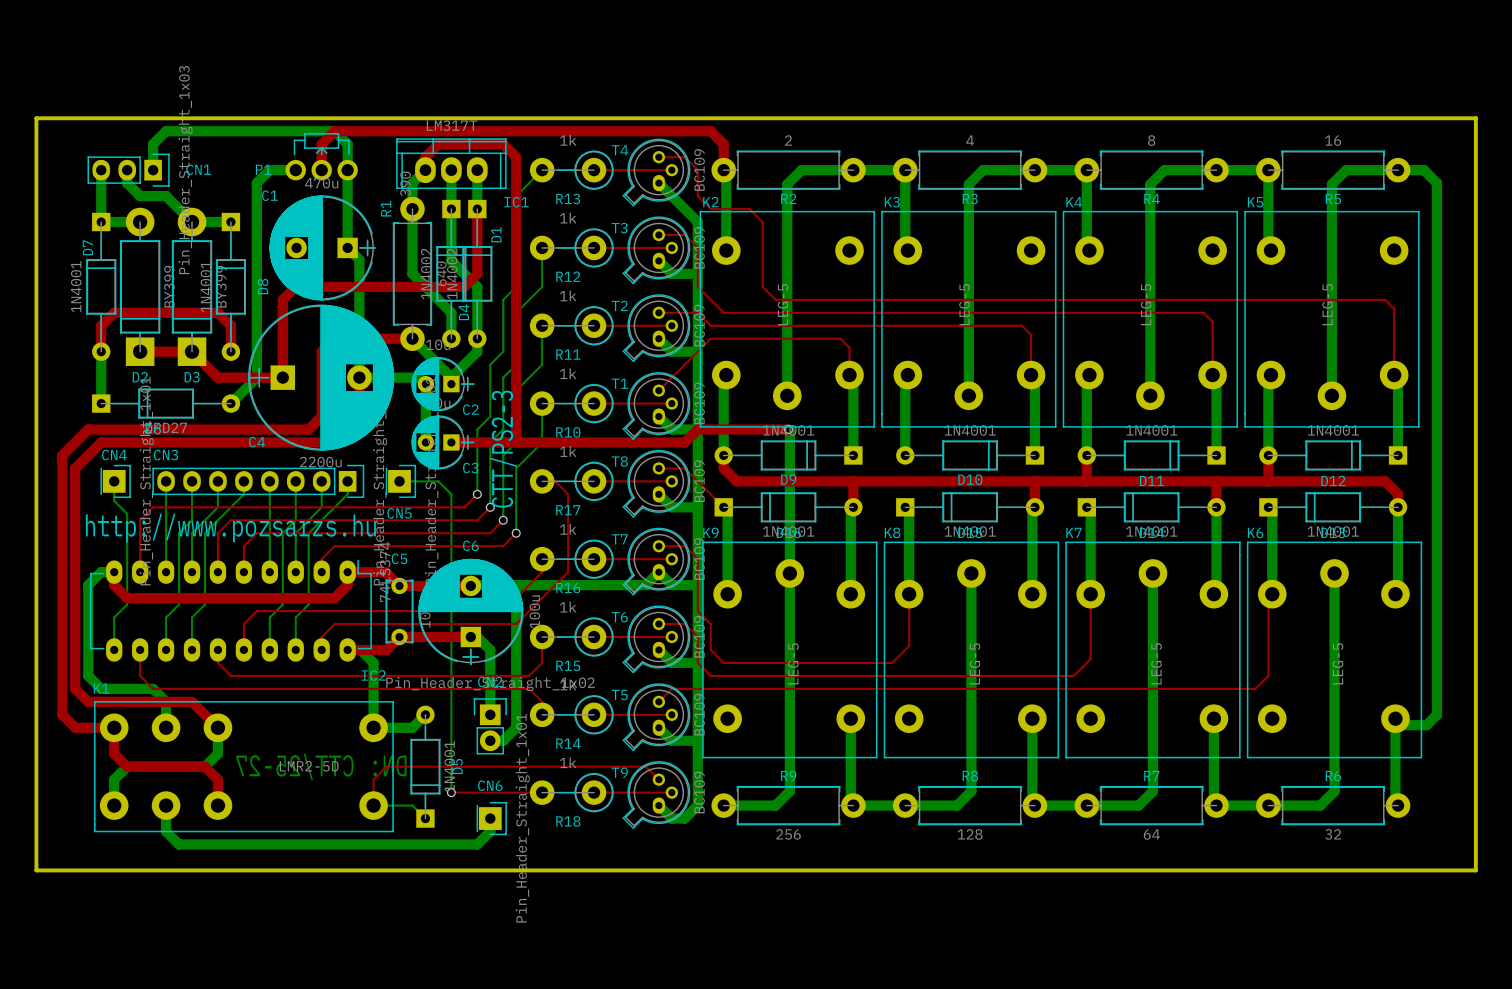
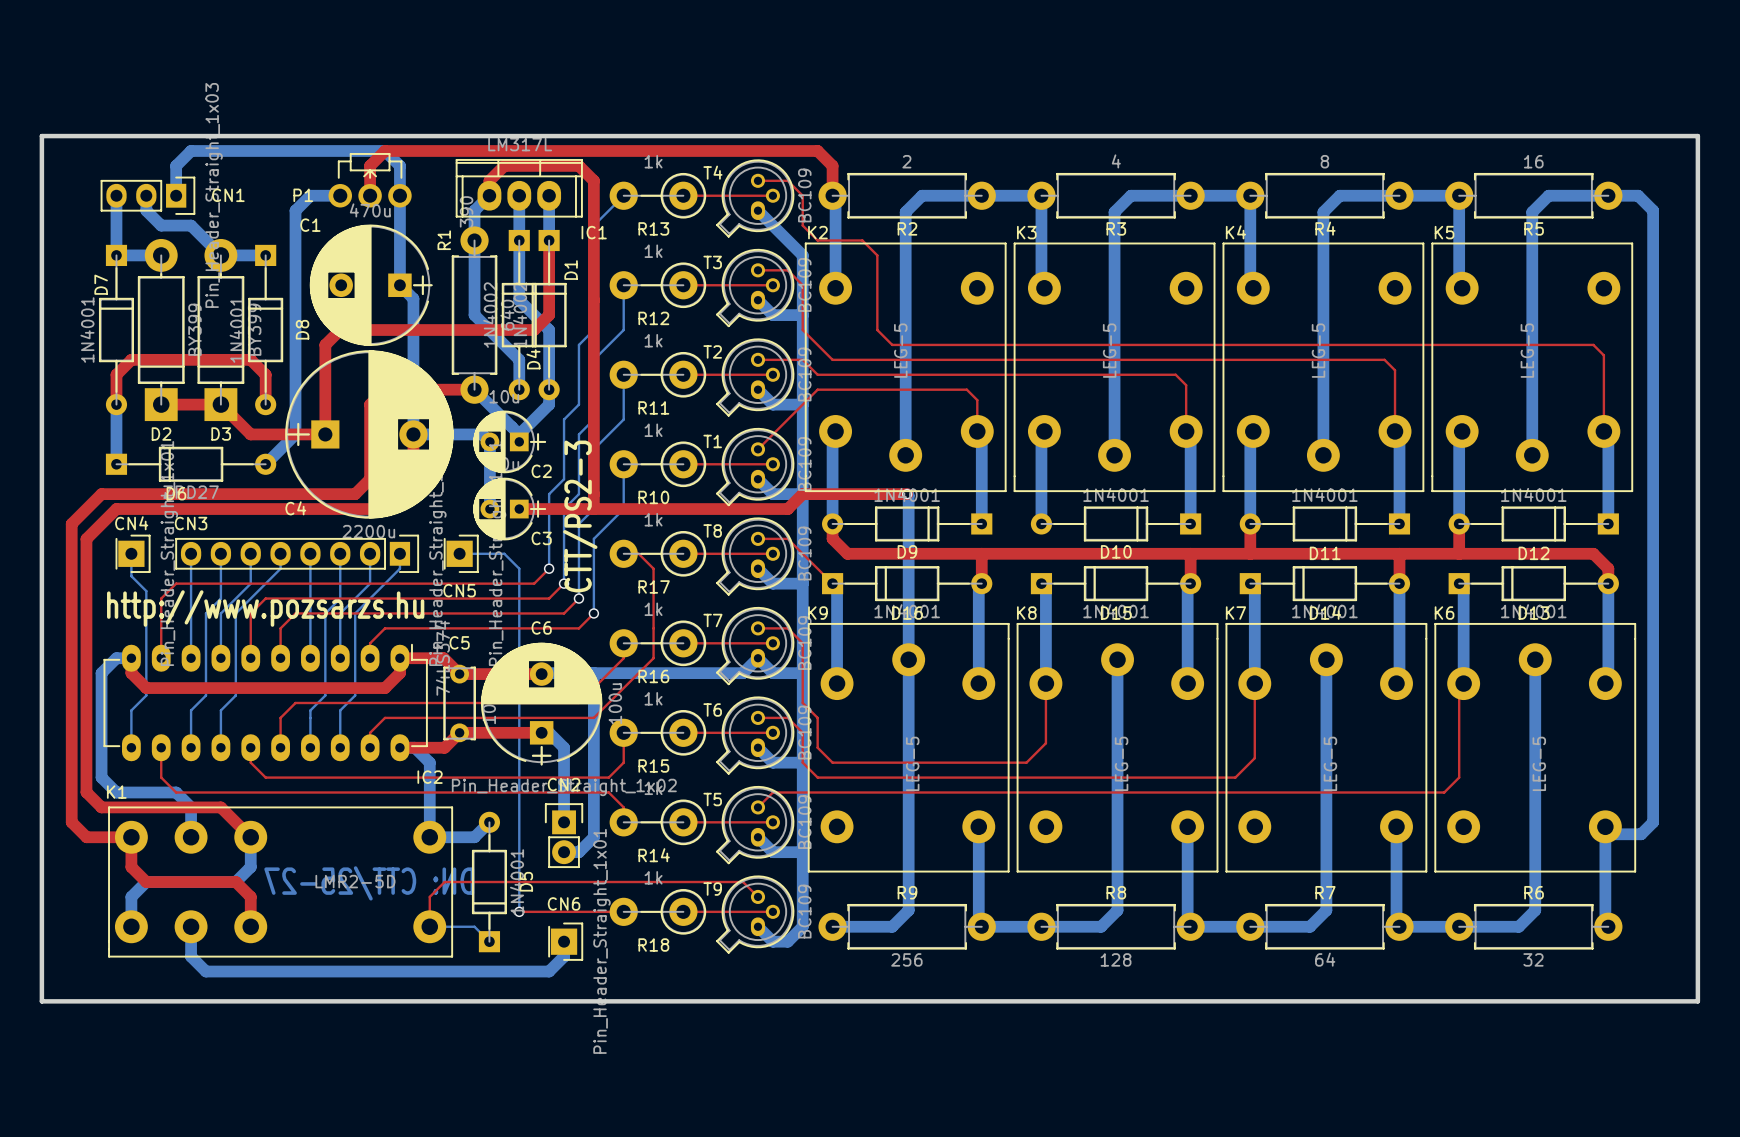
IC1 value: LM317T (452, 125) -> LM317L (520, 144)

